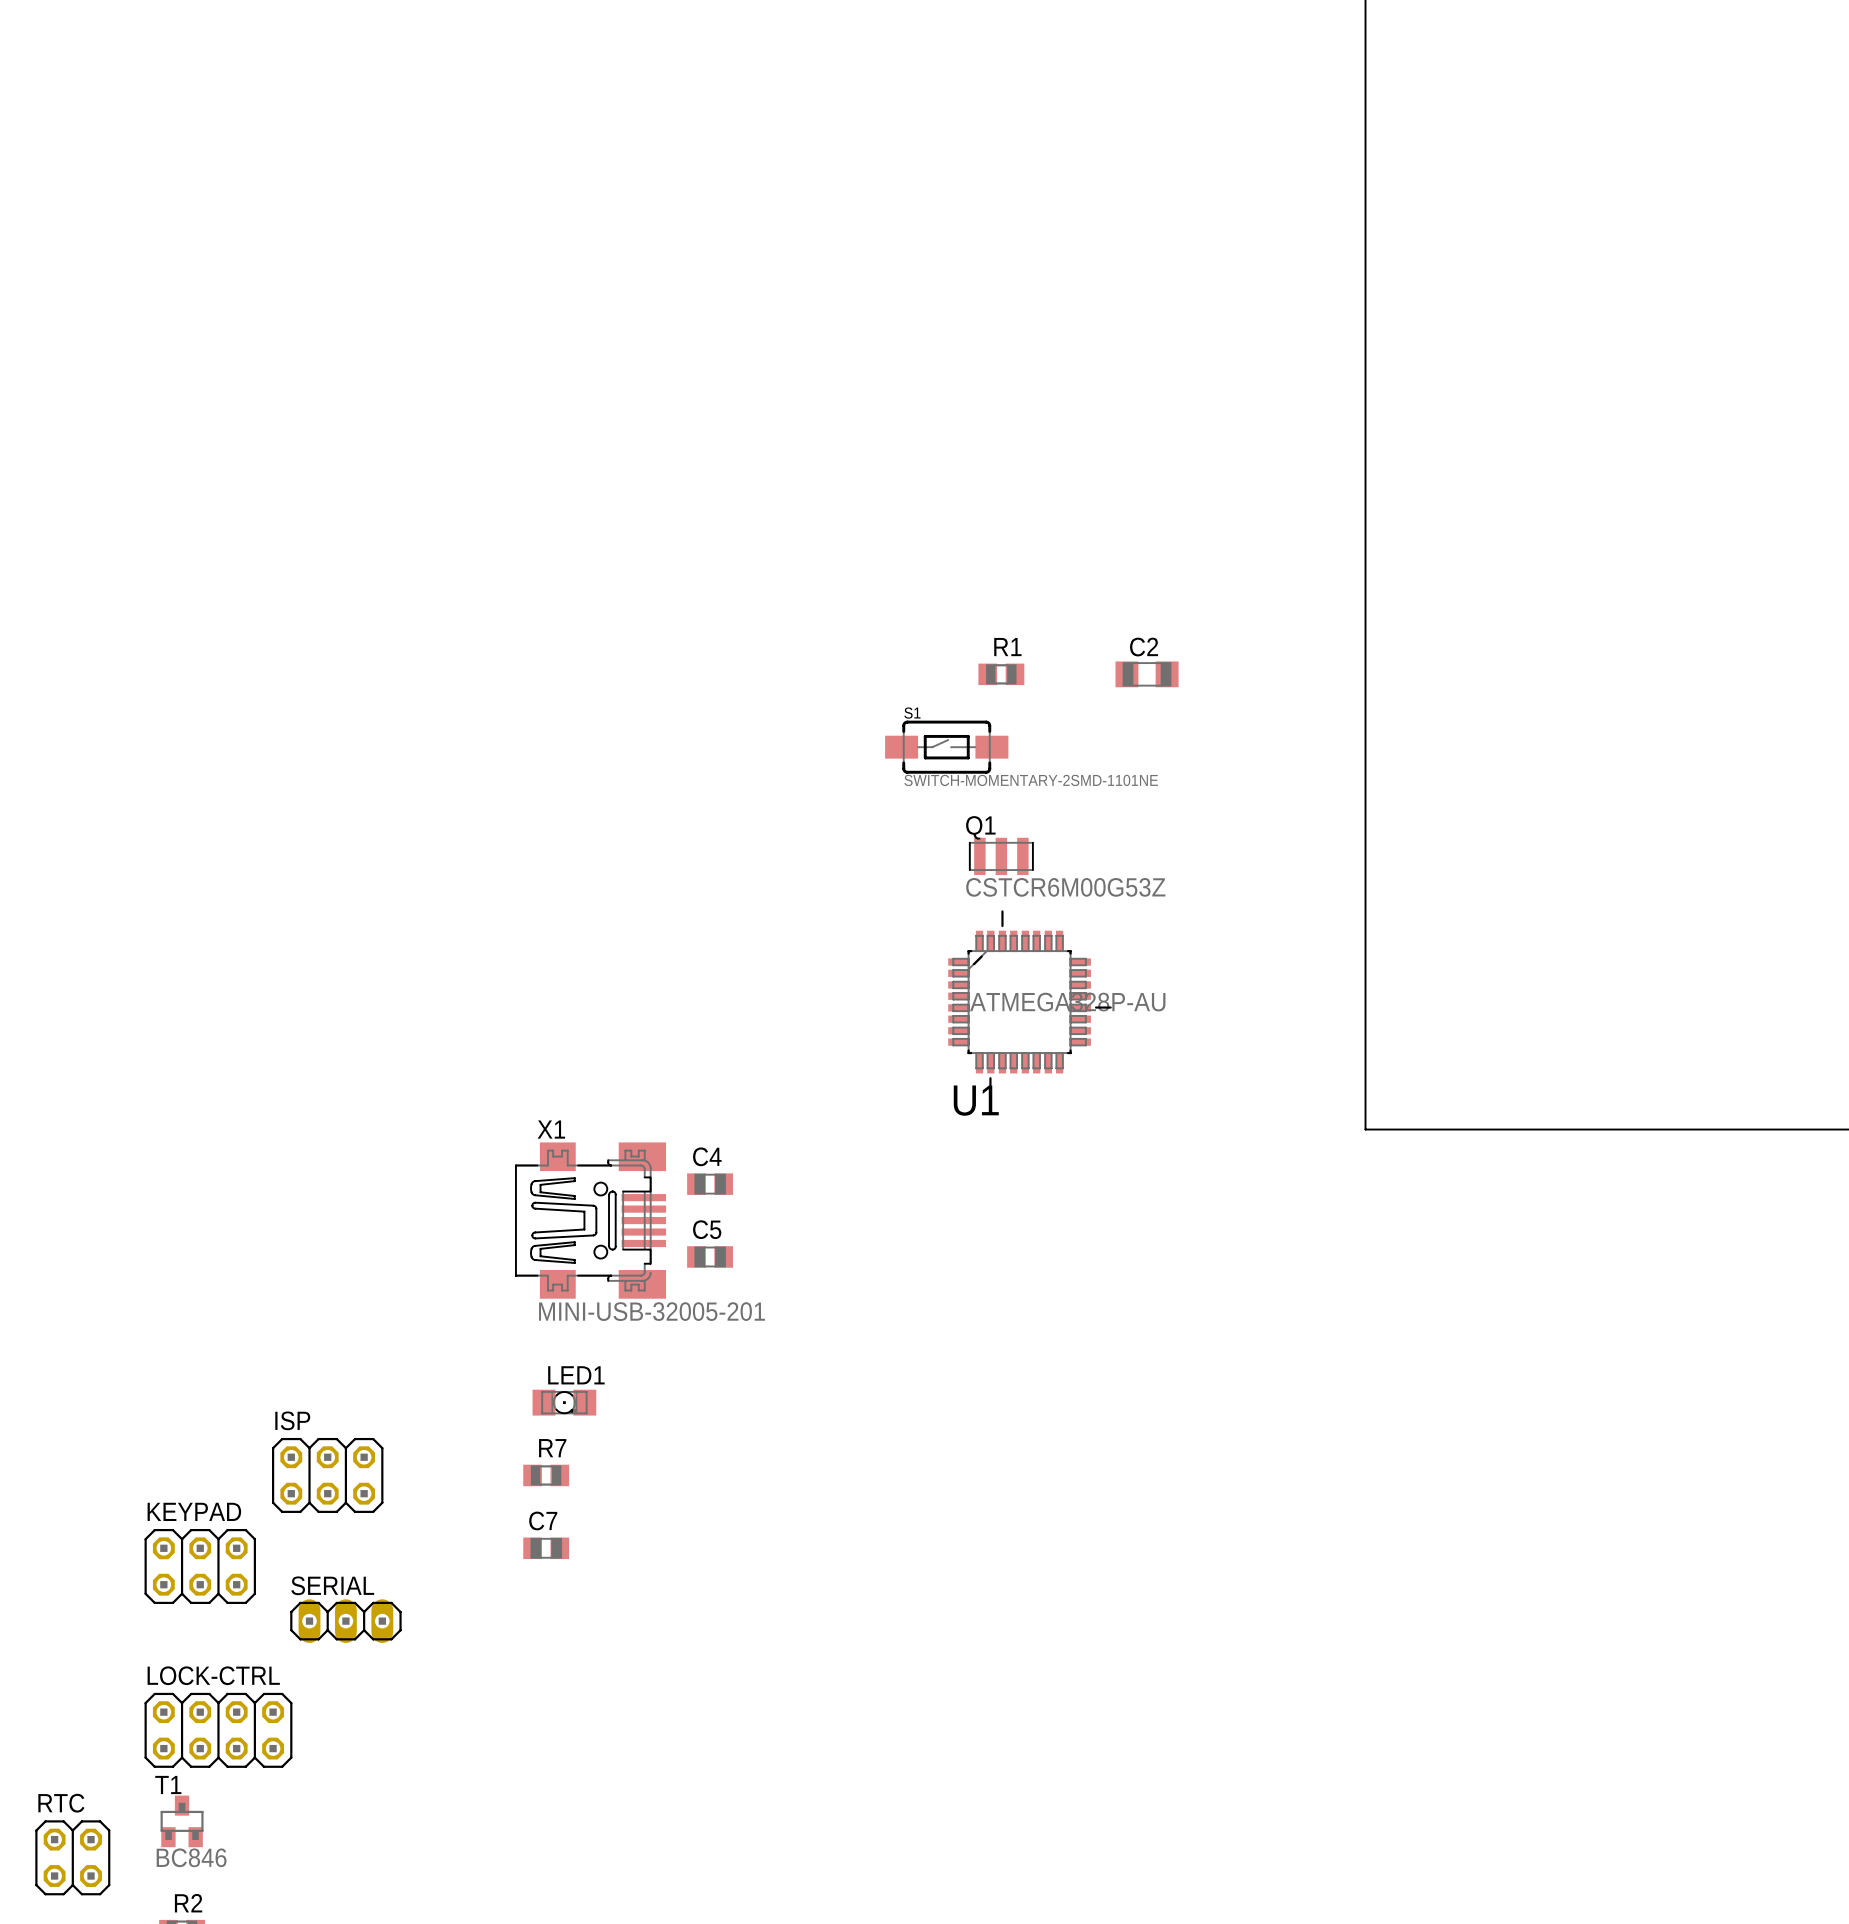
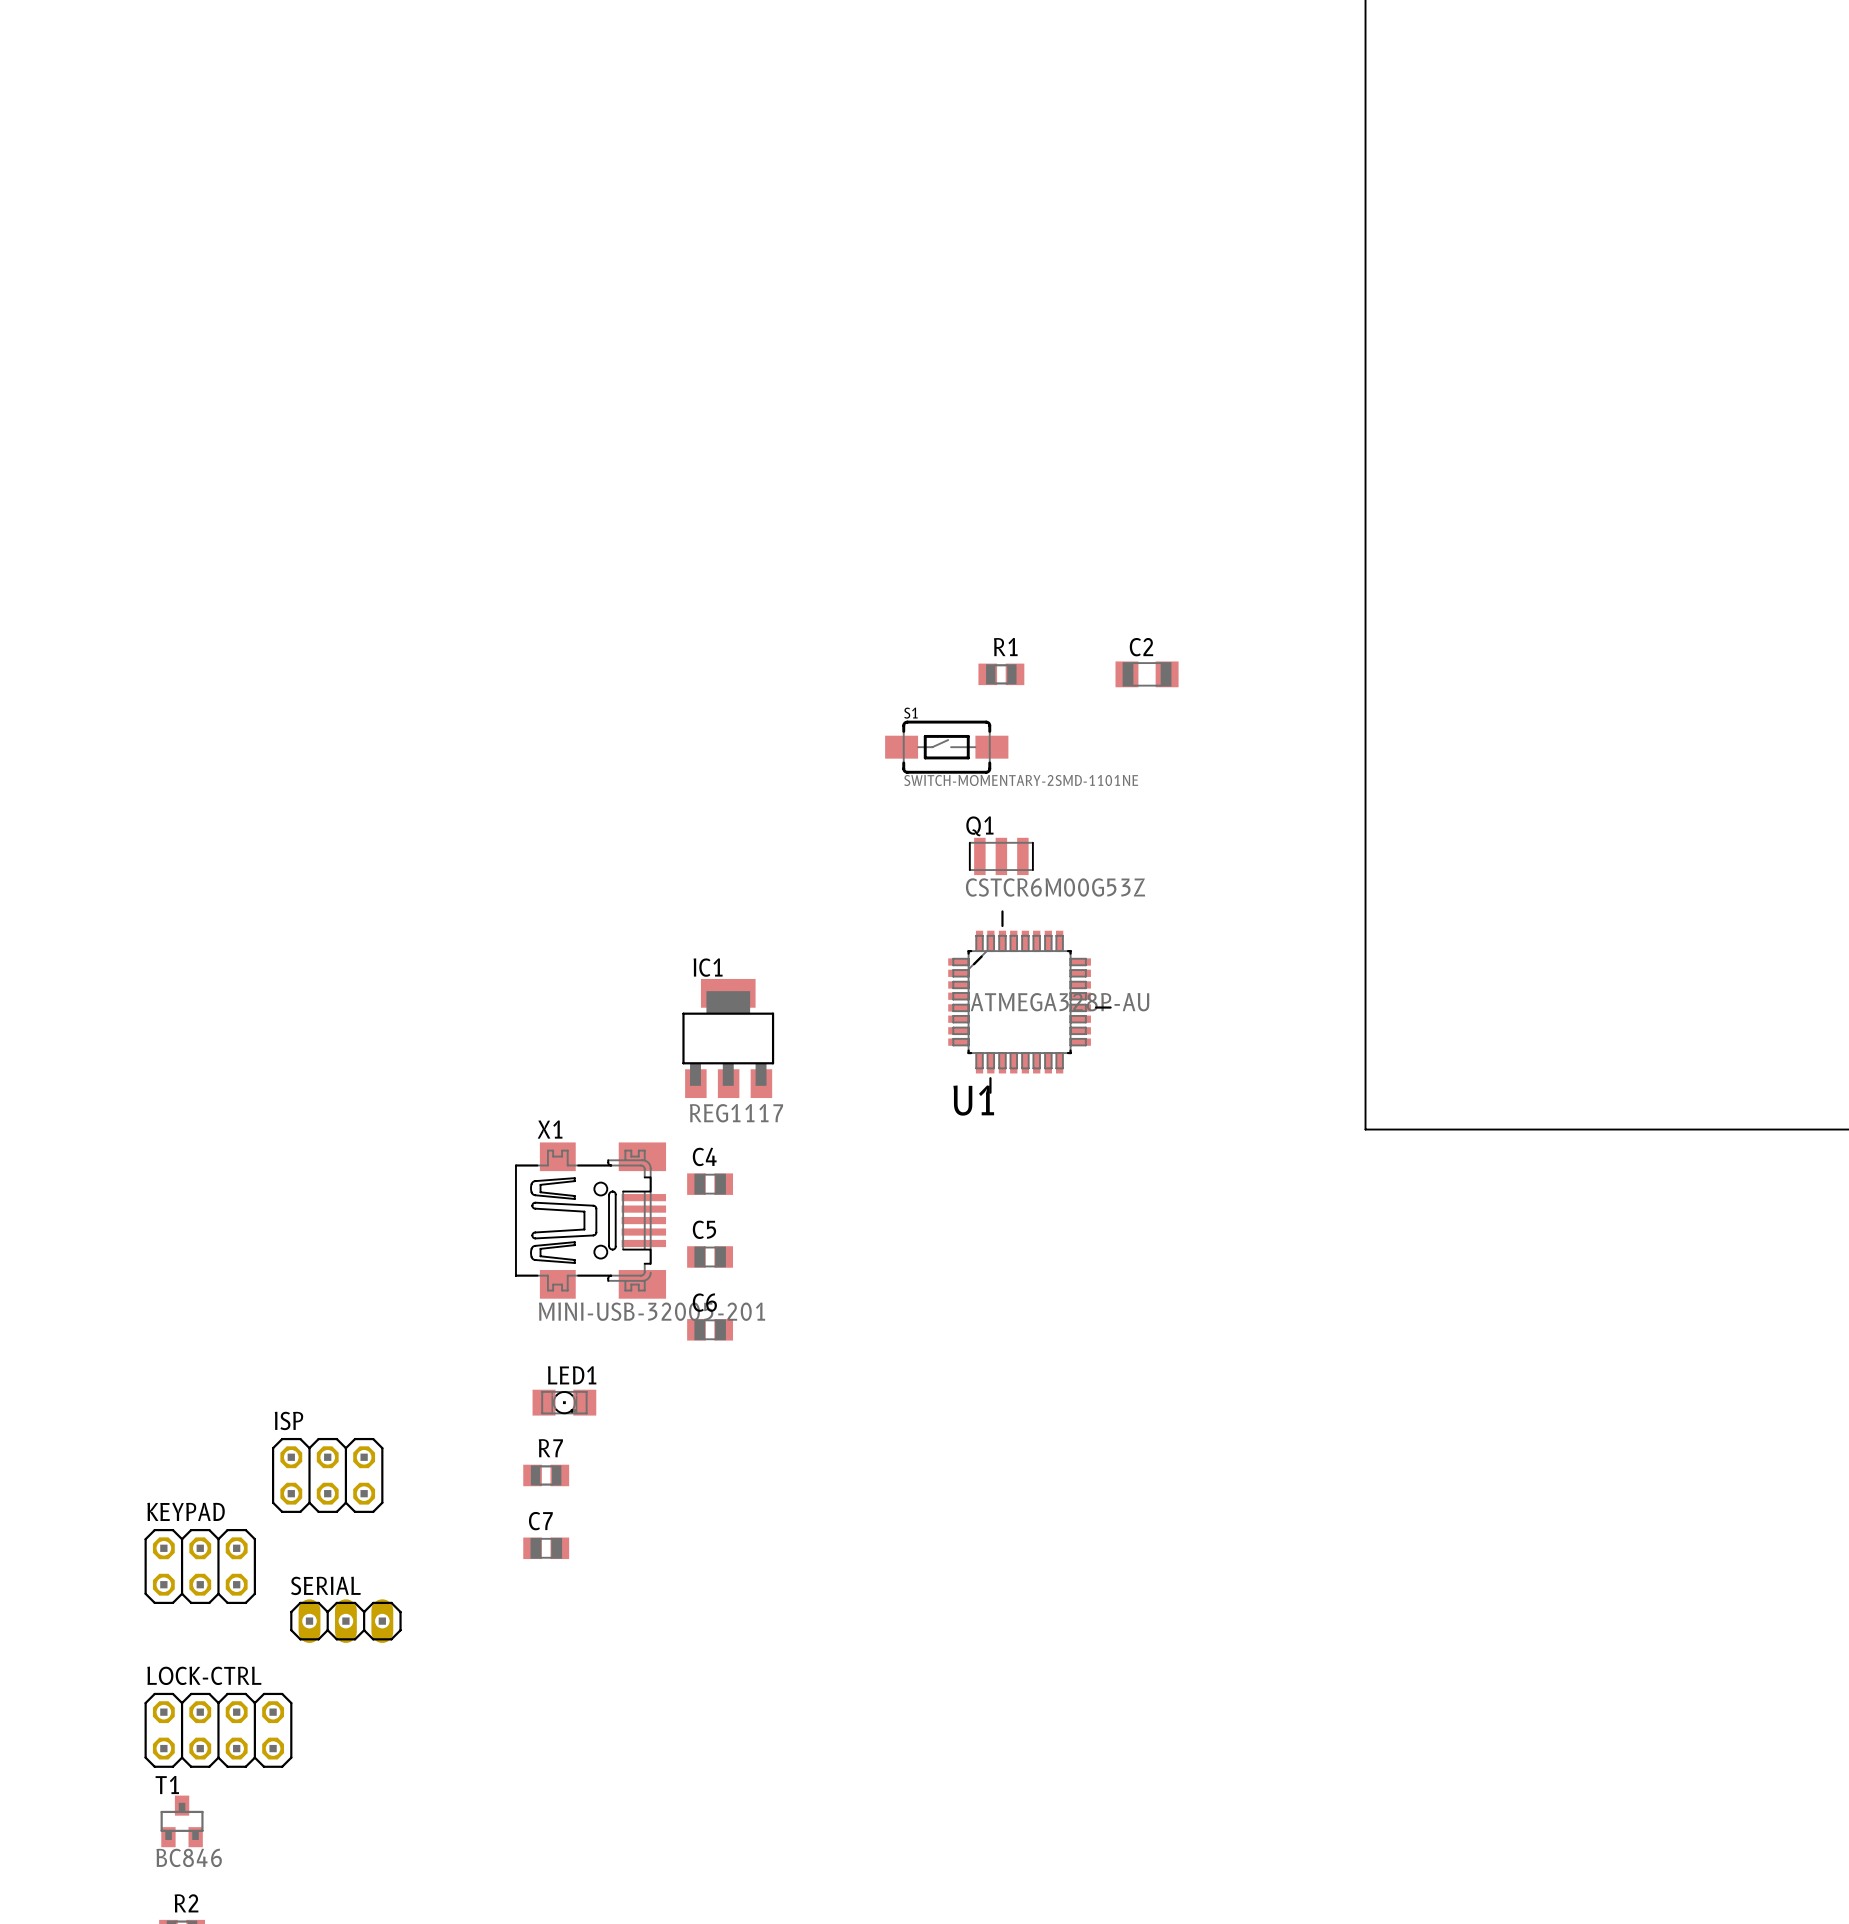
IC1: none -> REG1117 (728, 1038)
C6: none -> (710, 1329)
RTC: (72, 1857) -> none

